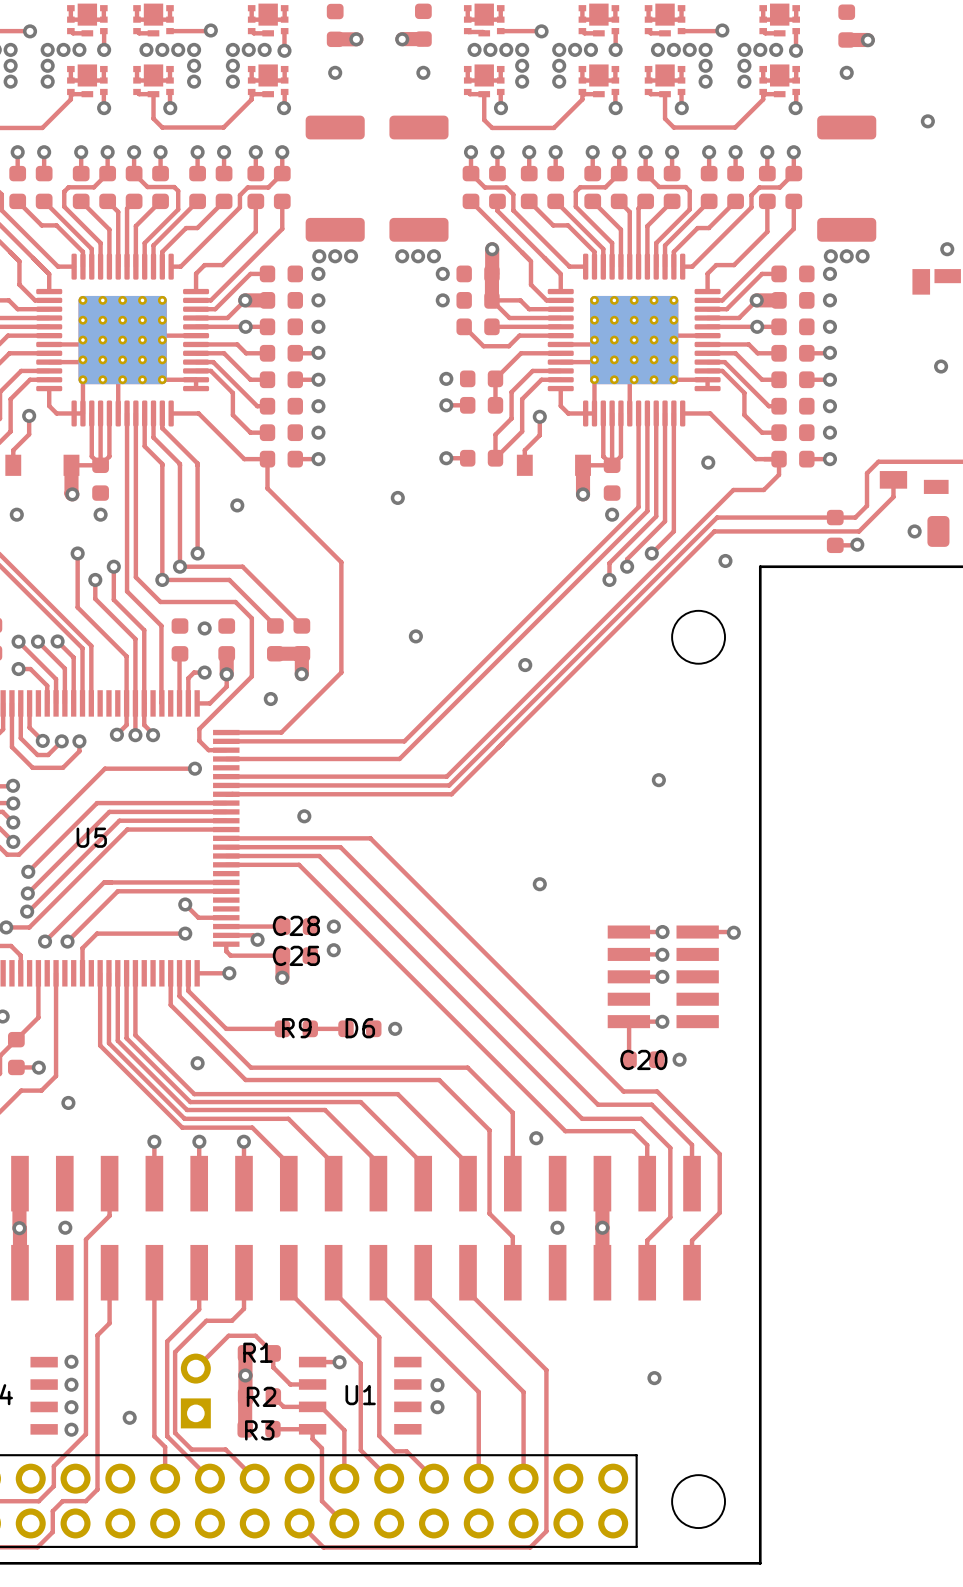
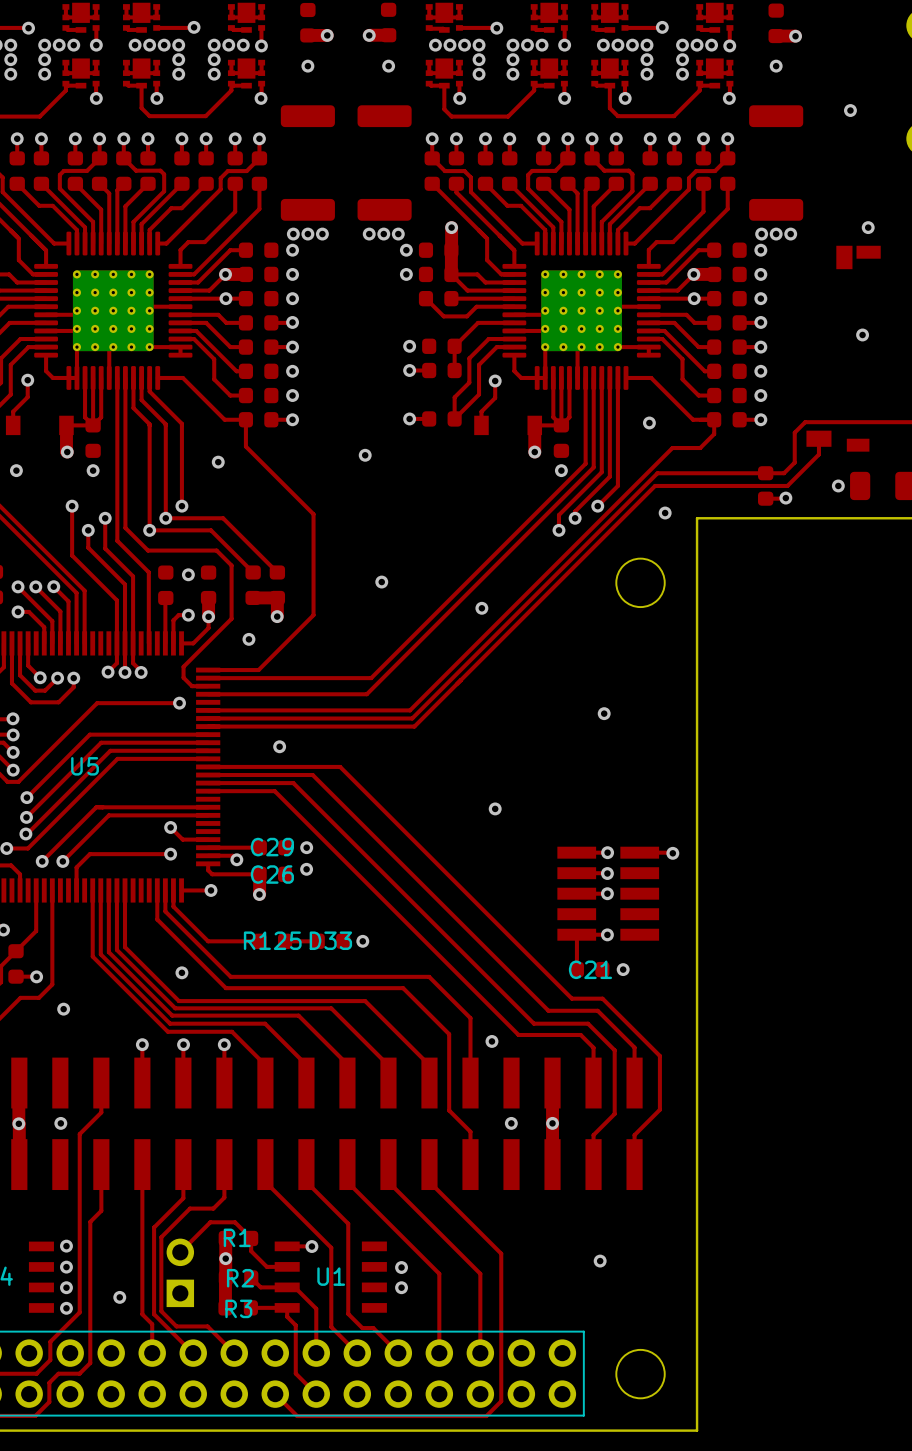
C28 name: C28 (296, 925) -> C29 (272, 847)
C25 name: C25 (296, 955) -> C26 (272, 874)
R9 name: R9 (296, 1028) -> R125 (272, 940)
D6 name: D6 (360, 1028) -> D33 (330, 940)
C20 name: C20 (643, 1059) -> C21 (590, 969)

